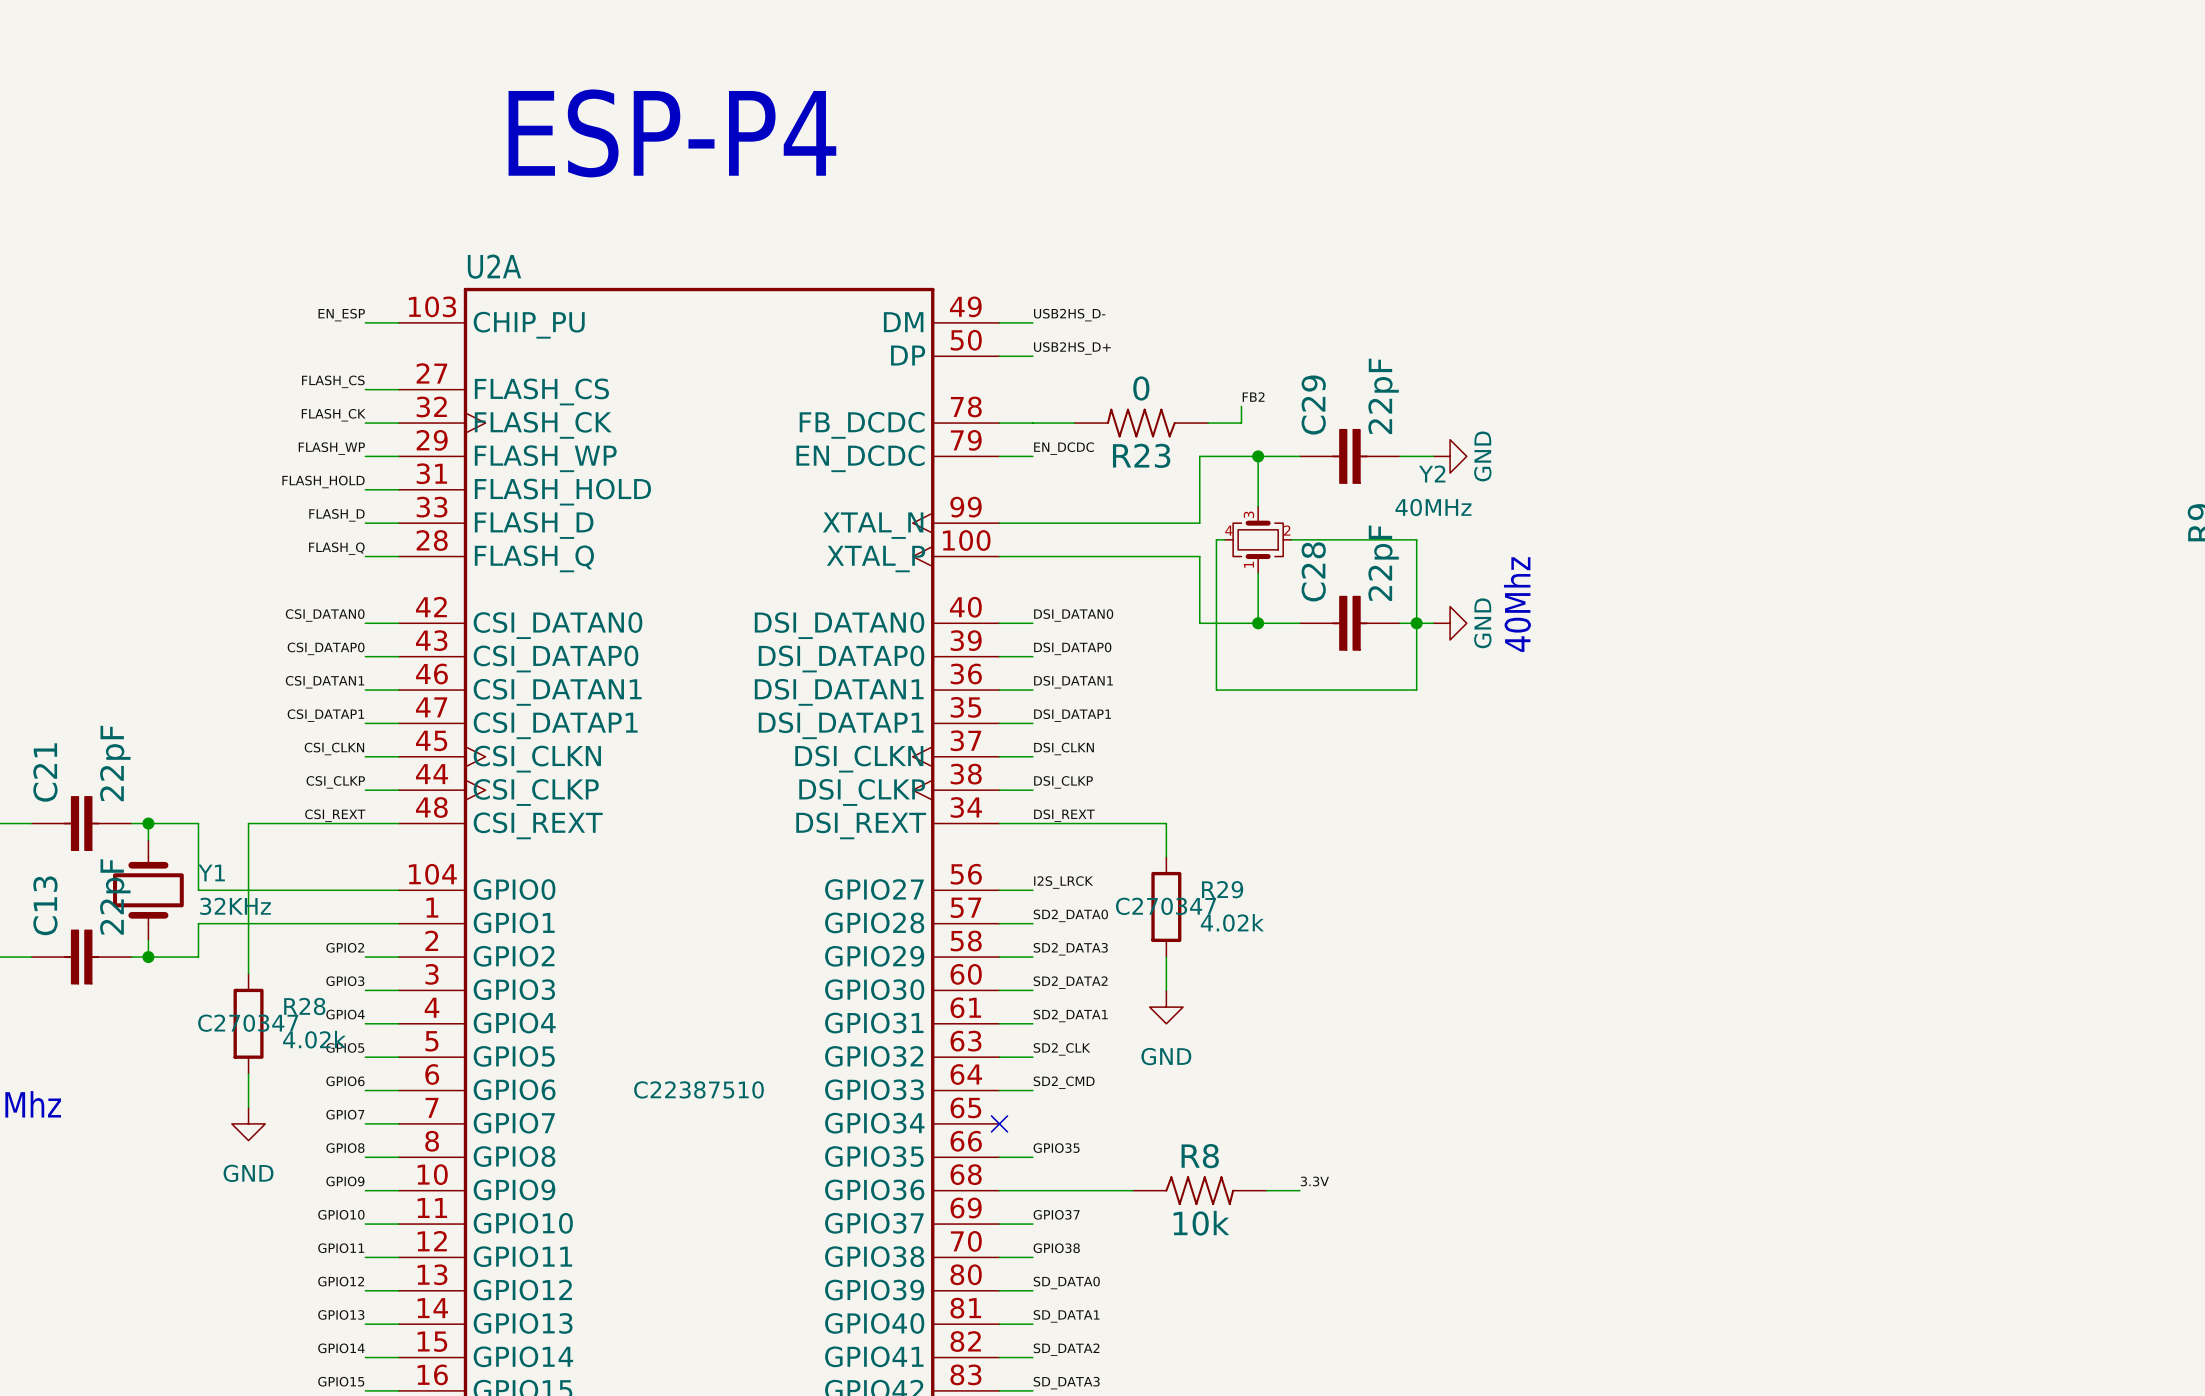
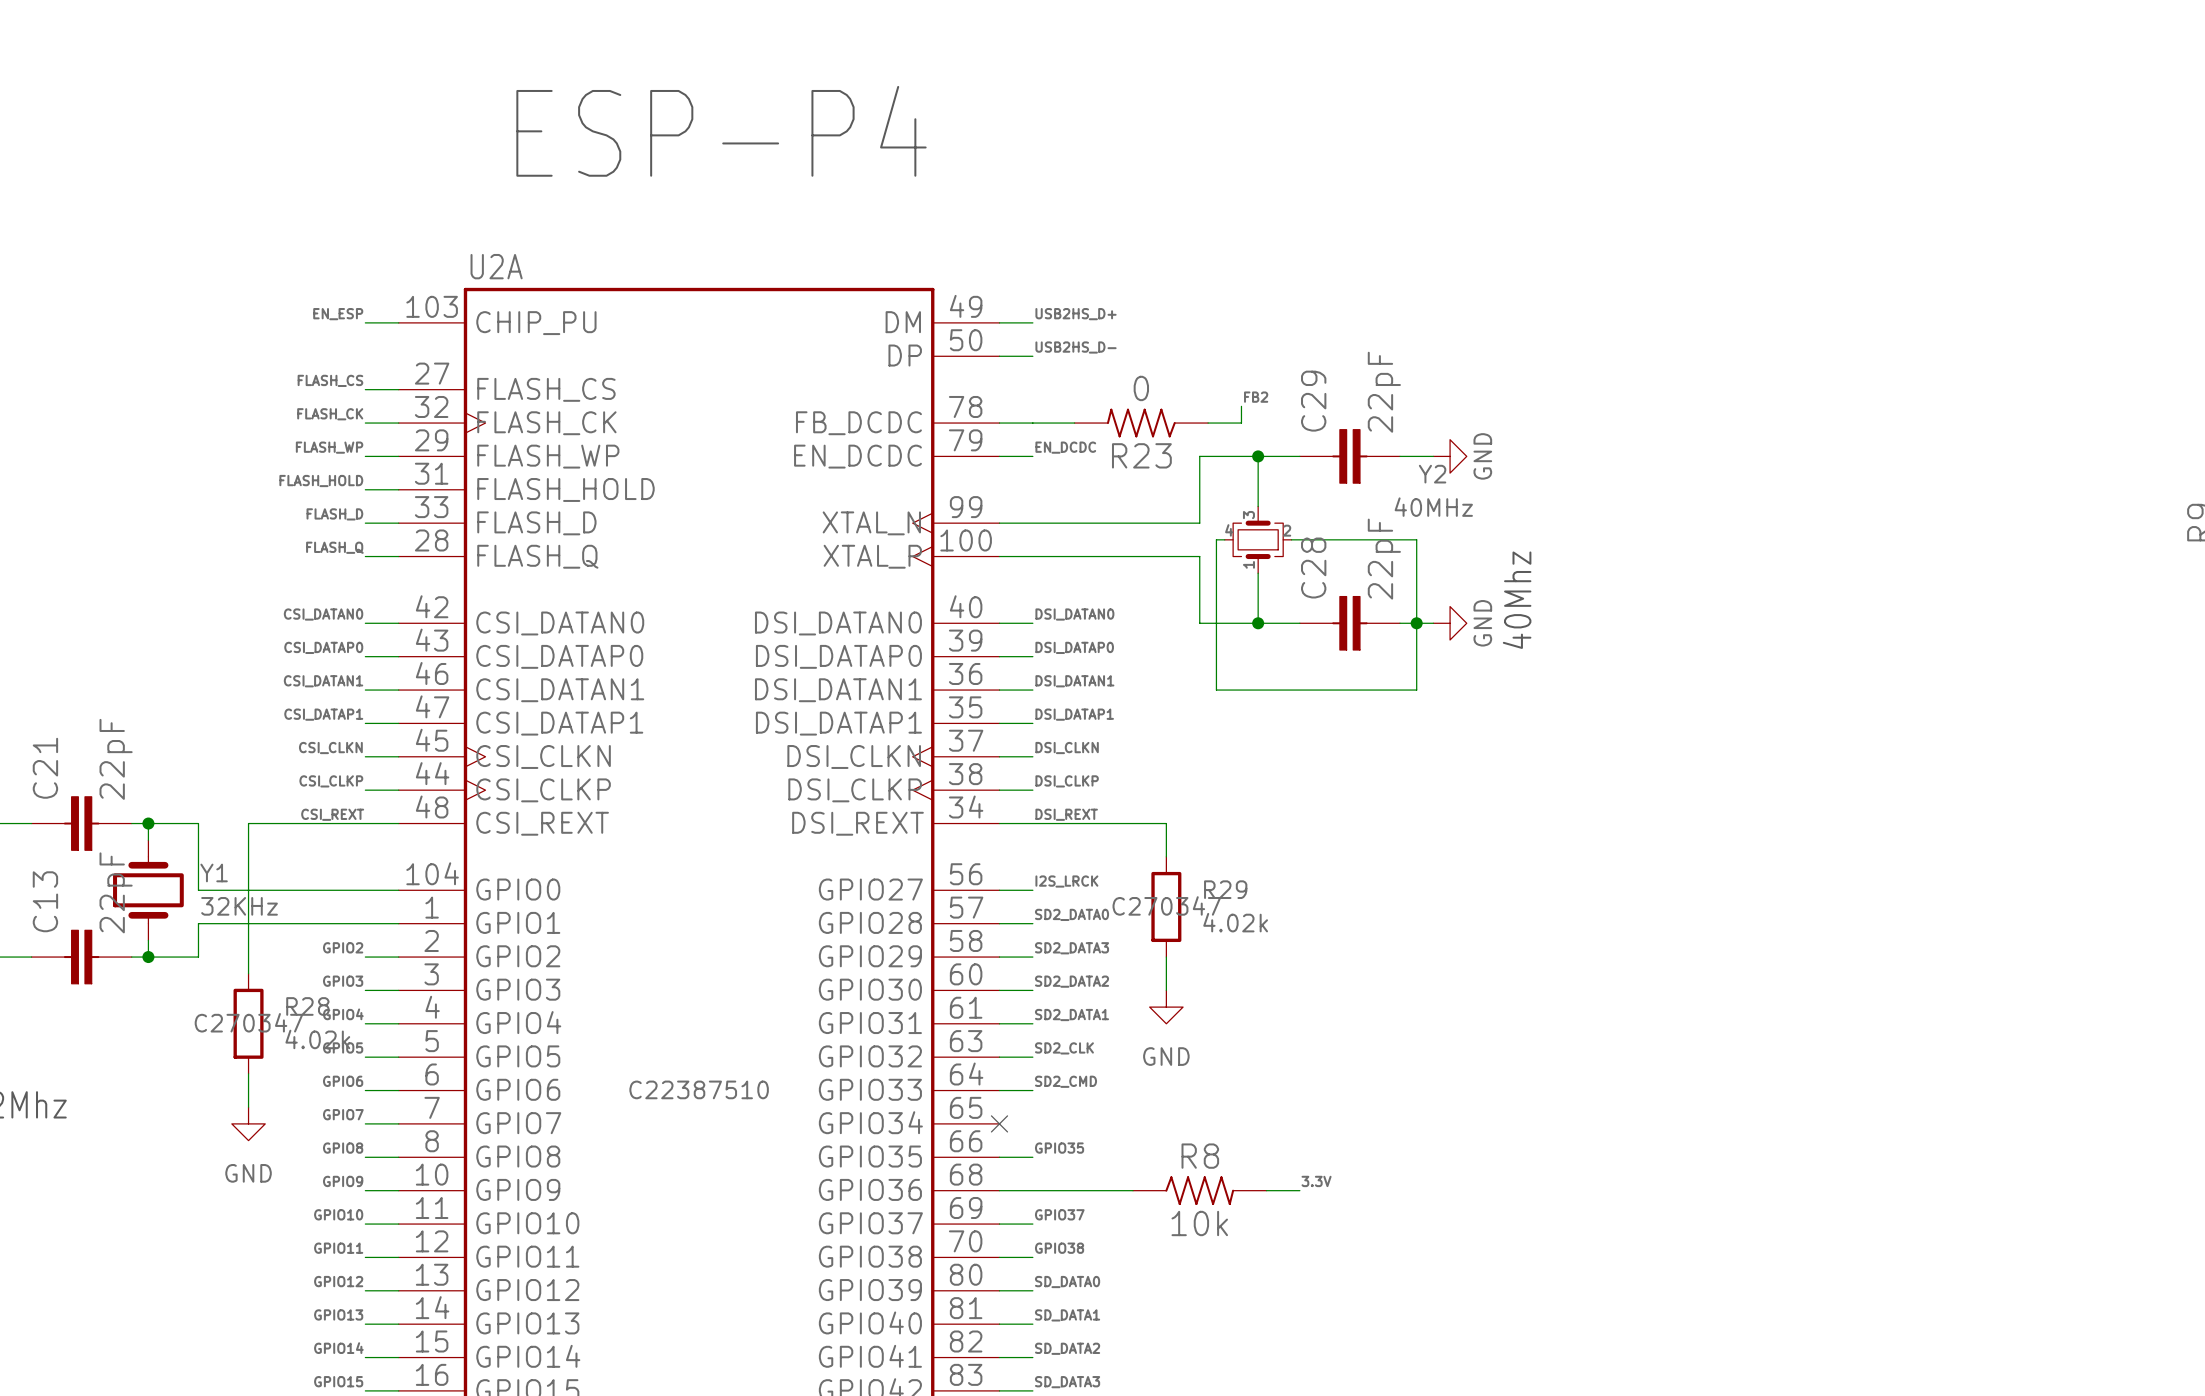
label: USB2HS_D- (1069, 315) -> USB2HS_D+ (1076, 314)
label: USB2HS_D+ (1072, 348) -> USB2HS_D- (1076, 347)

